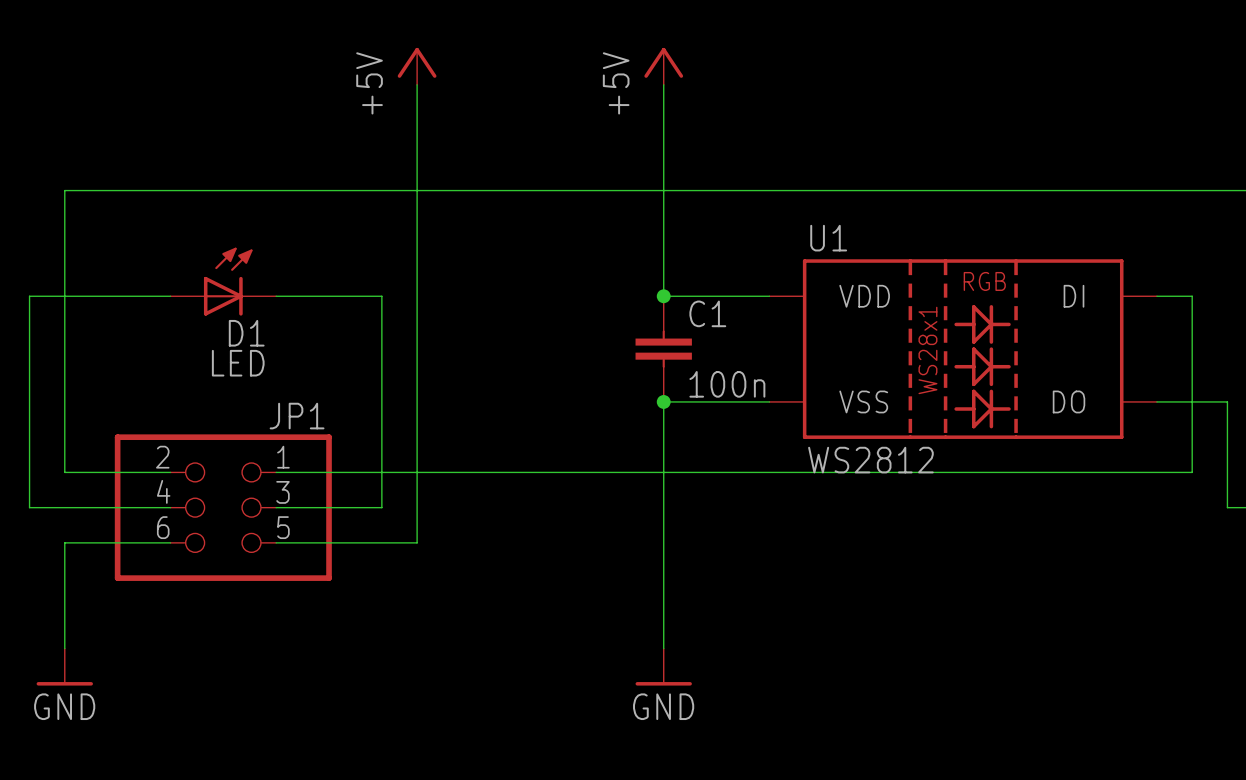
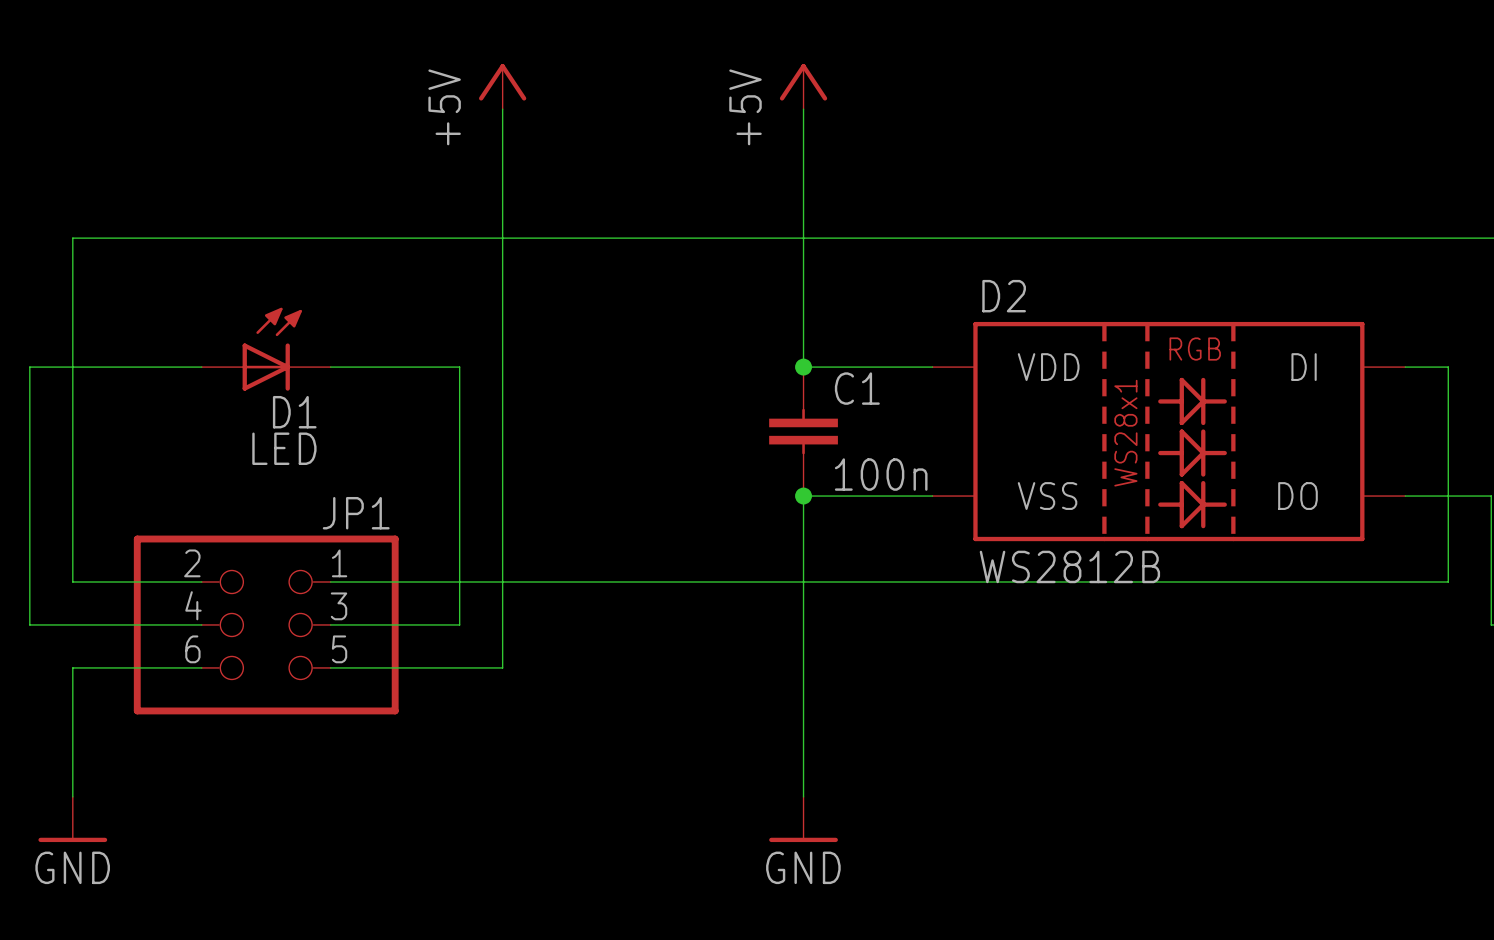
U1 name: U1 (828, 238) -> D2 (1004, 296)
U1 value: WS2812 (870, 460) -> WS2812B (1069, 566)

